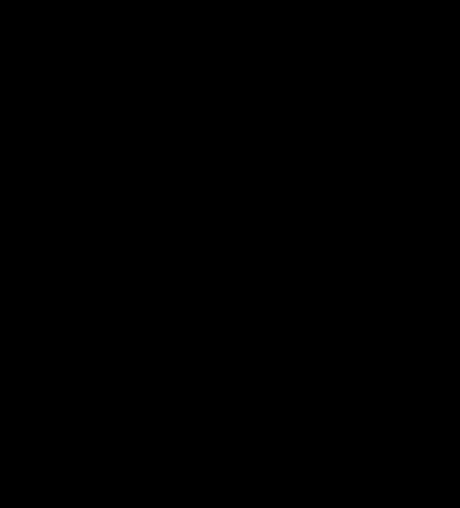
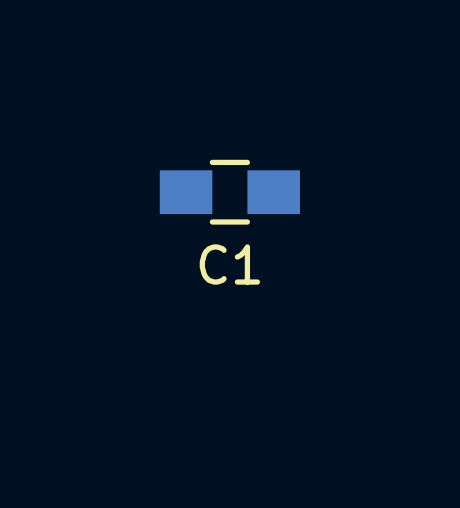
C1: none -> (229, 192)

